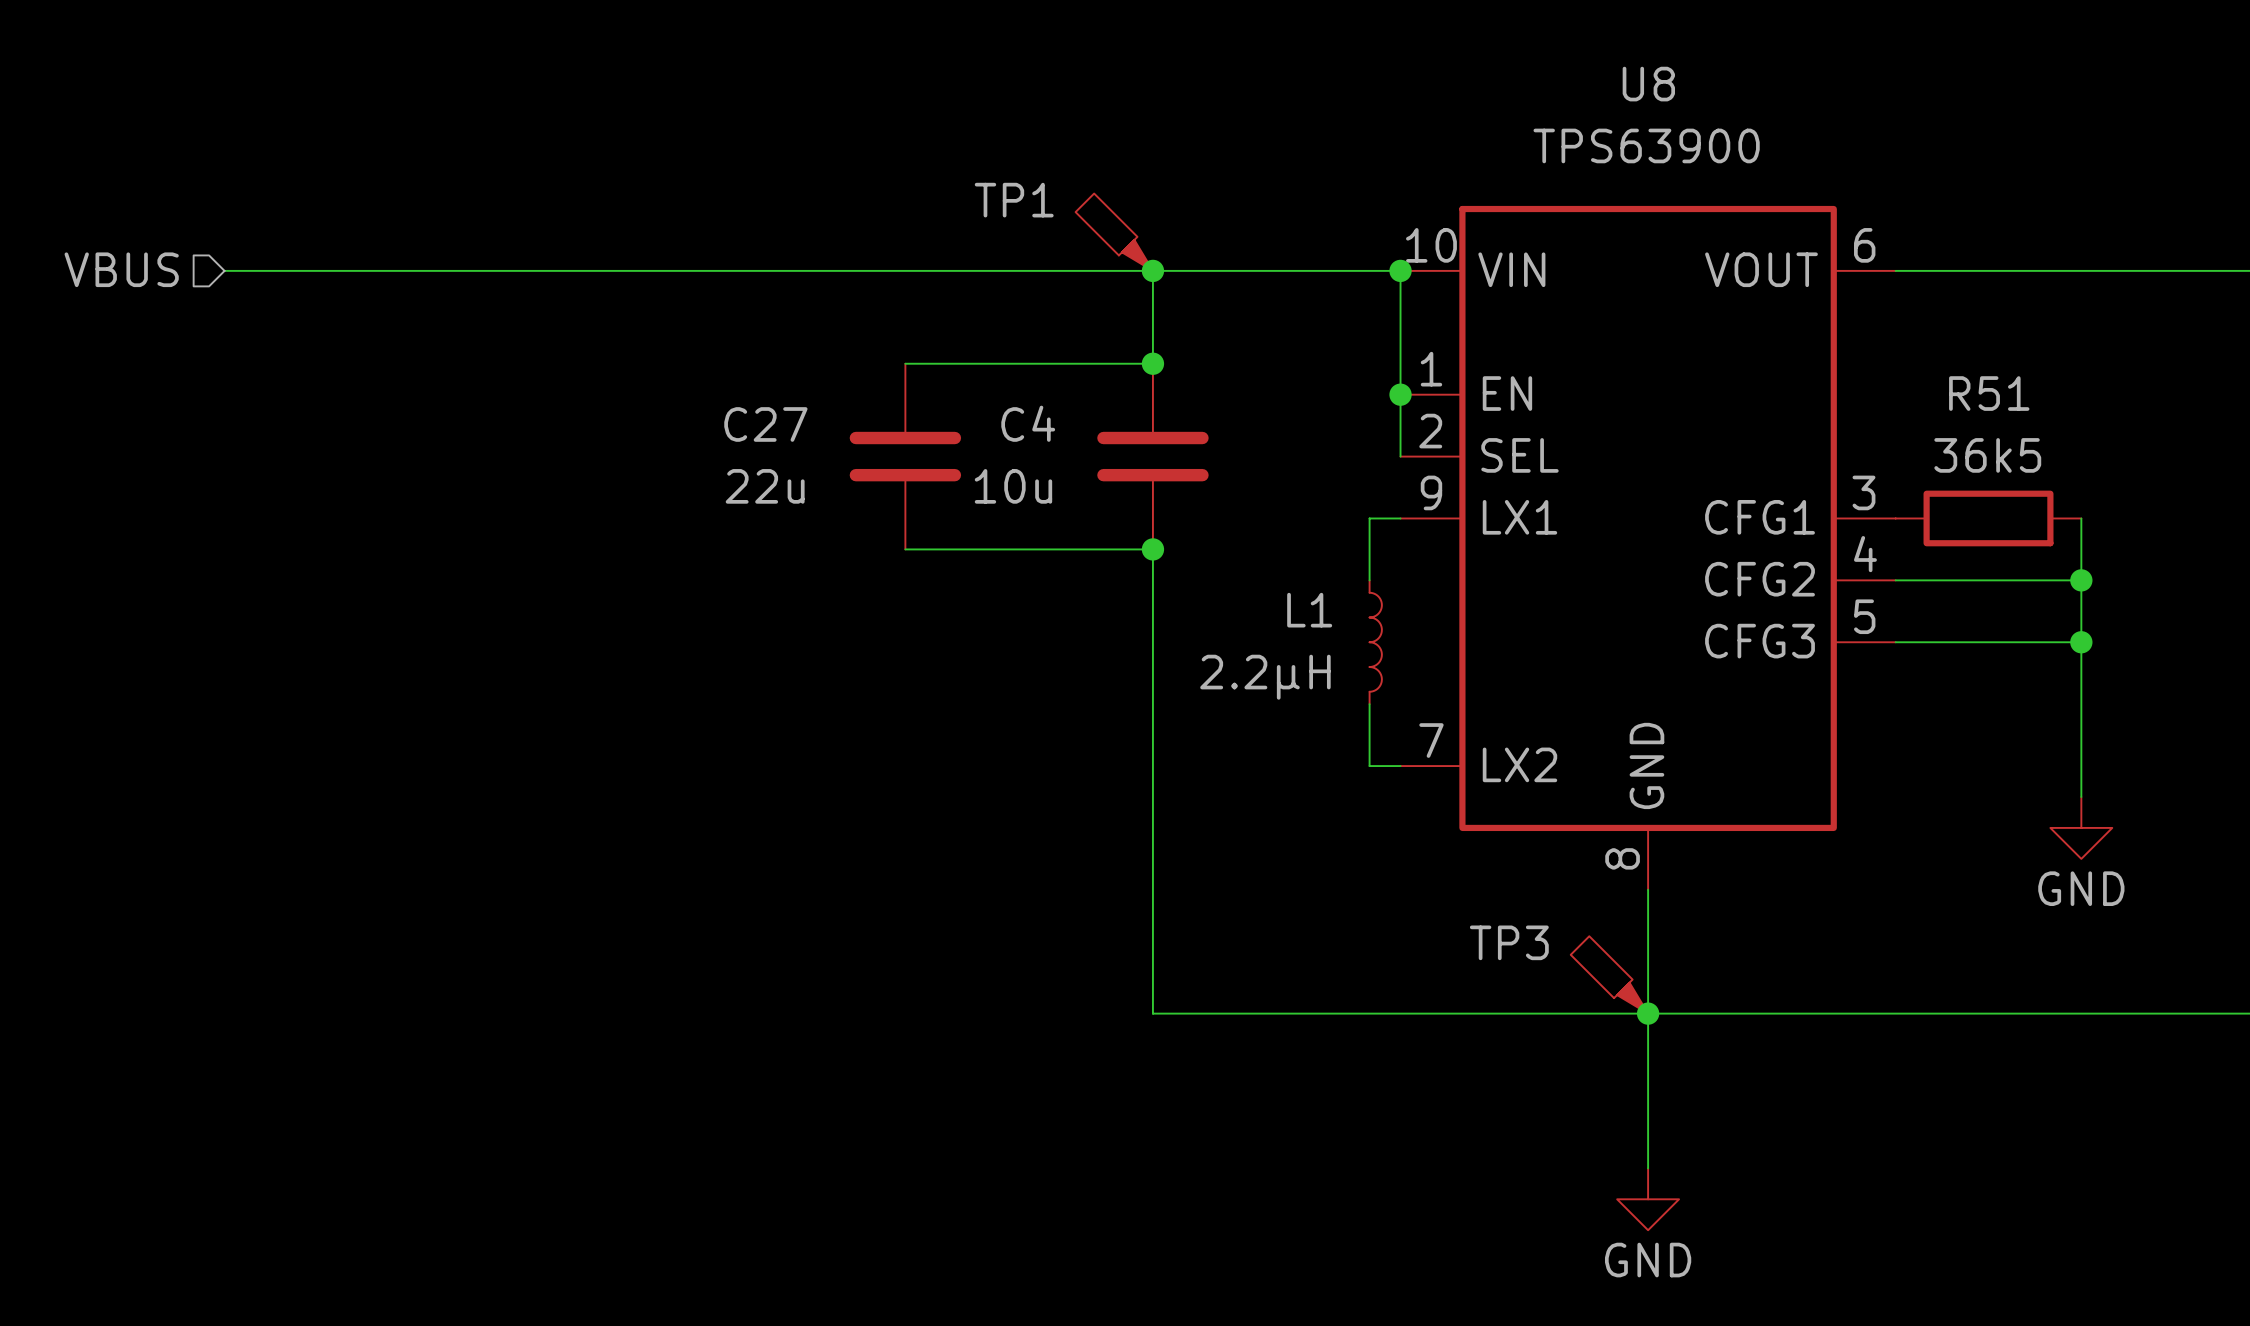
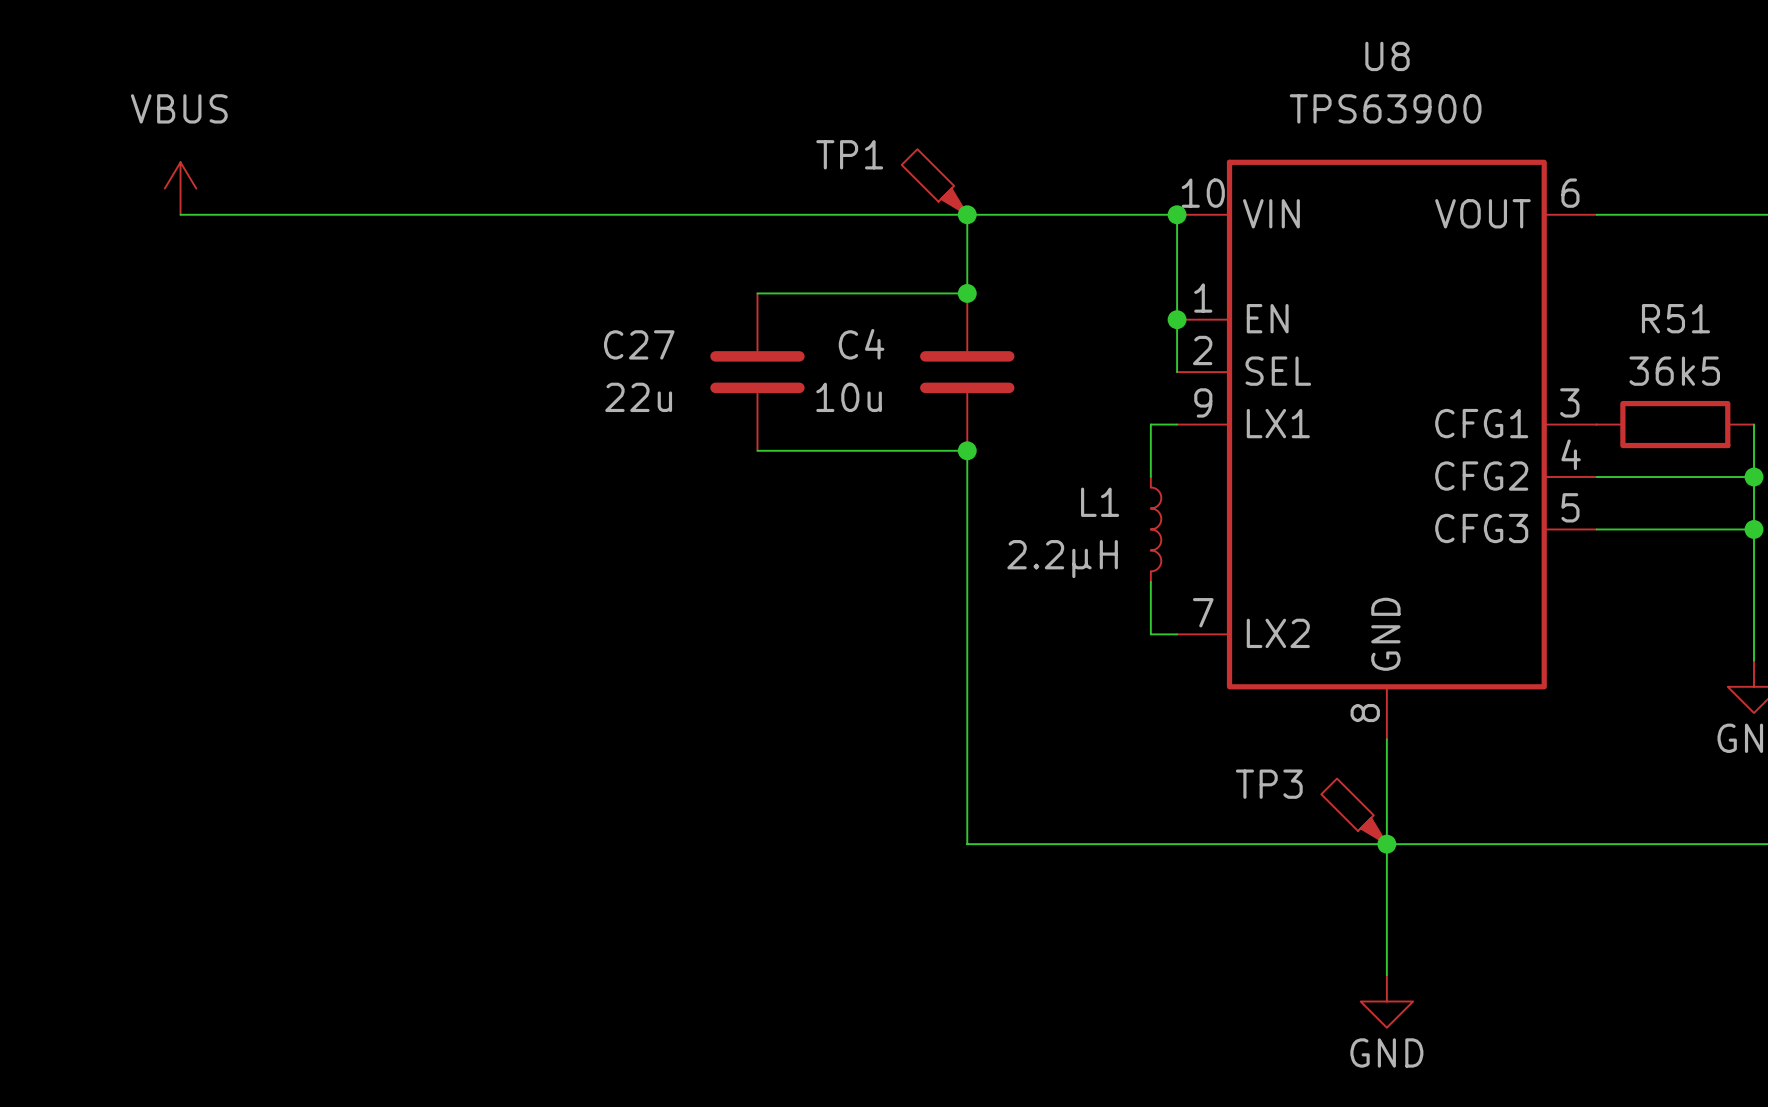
power symbol: none -> VBUS (180, 188)
hierarchical label: VBUS (121, 269) -> none

